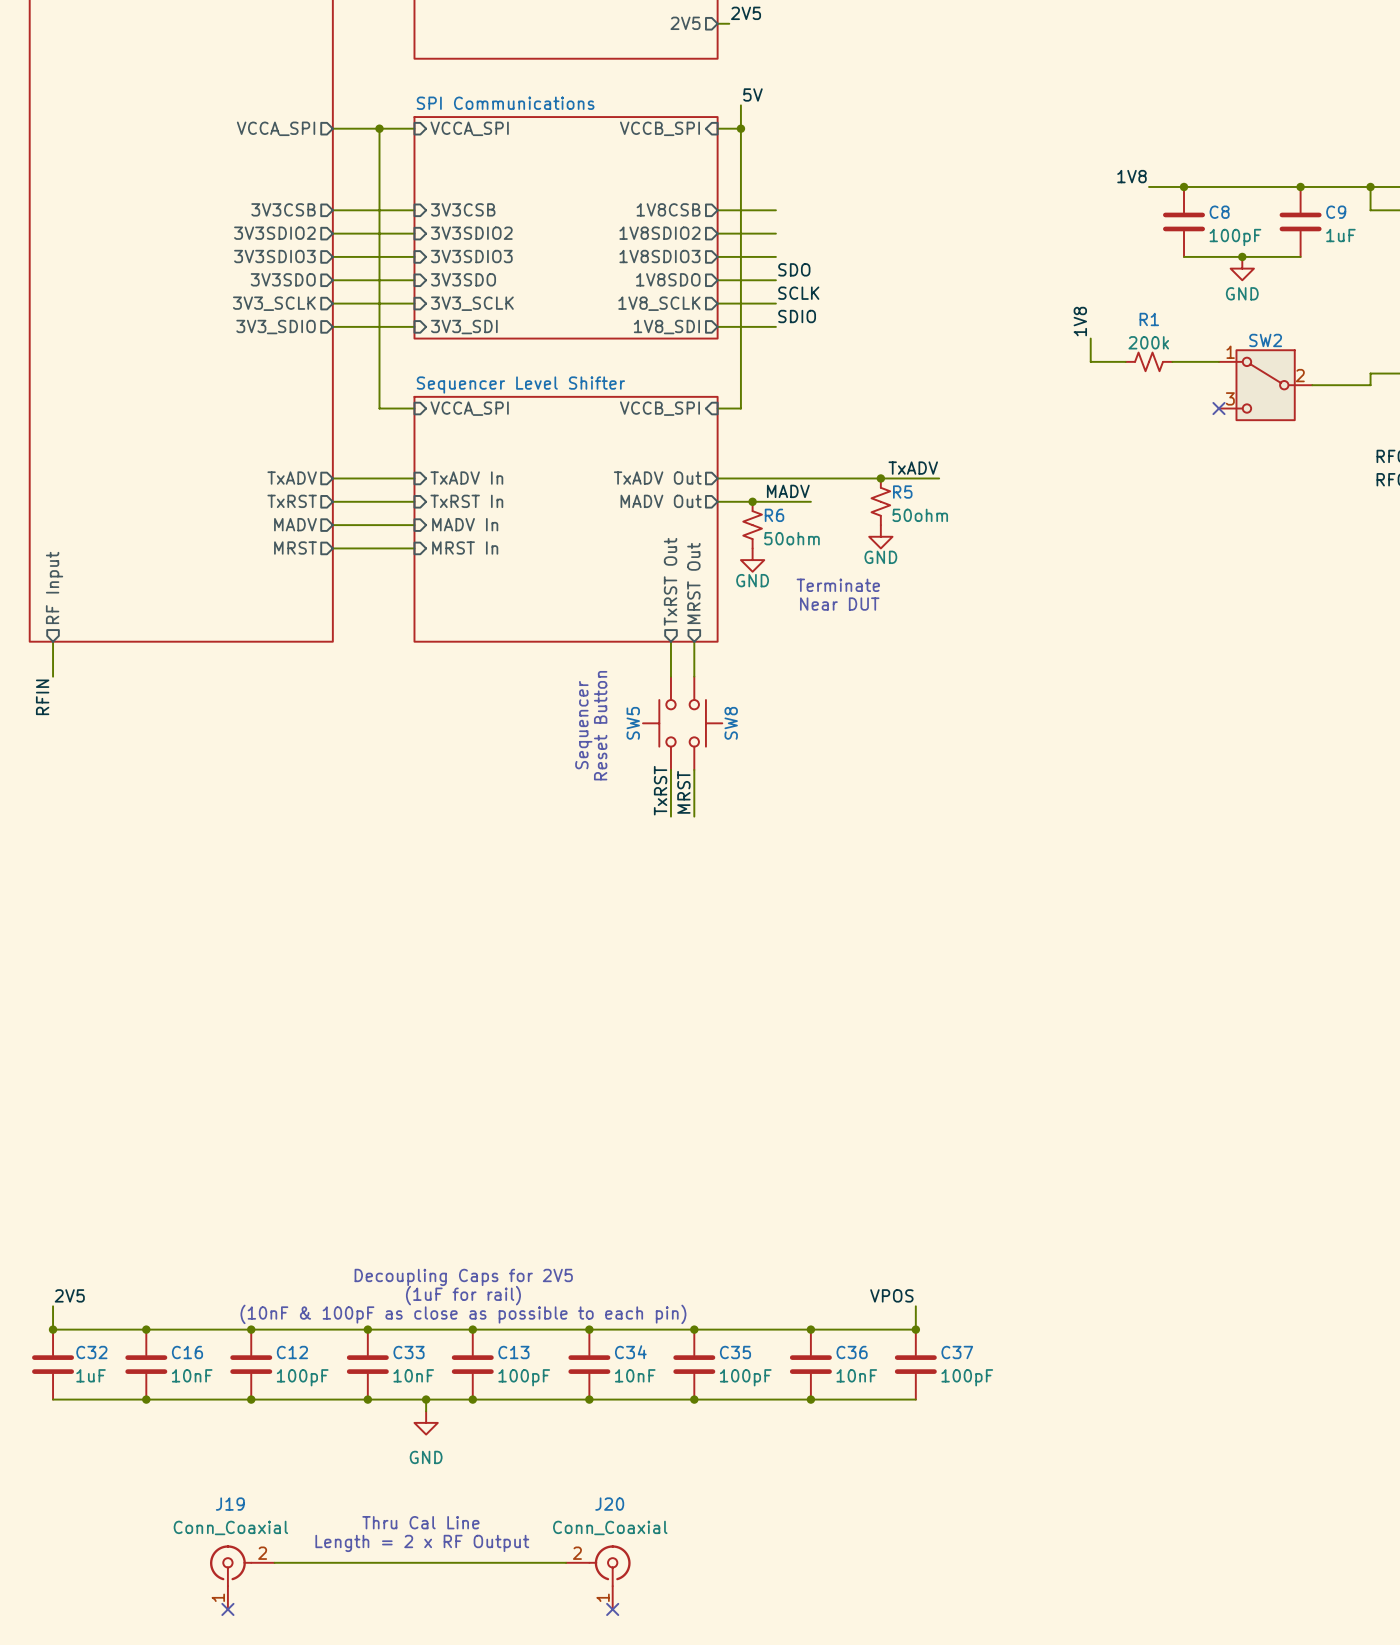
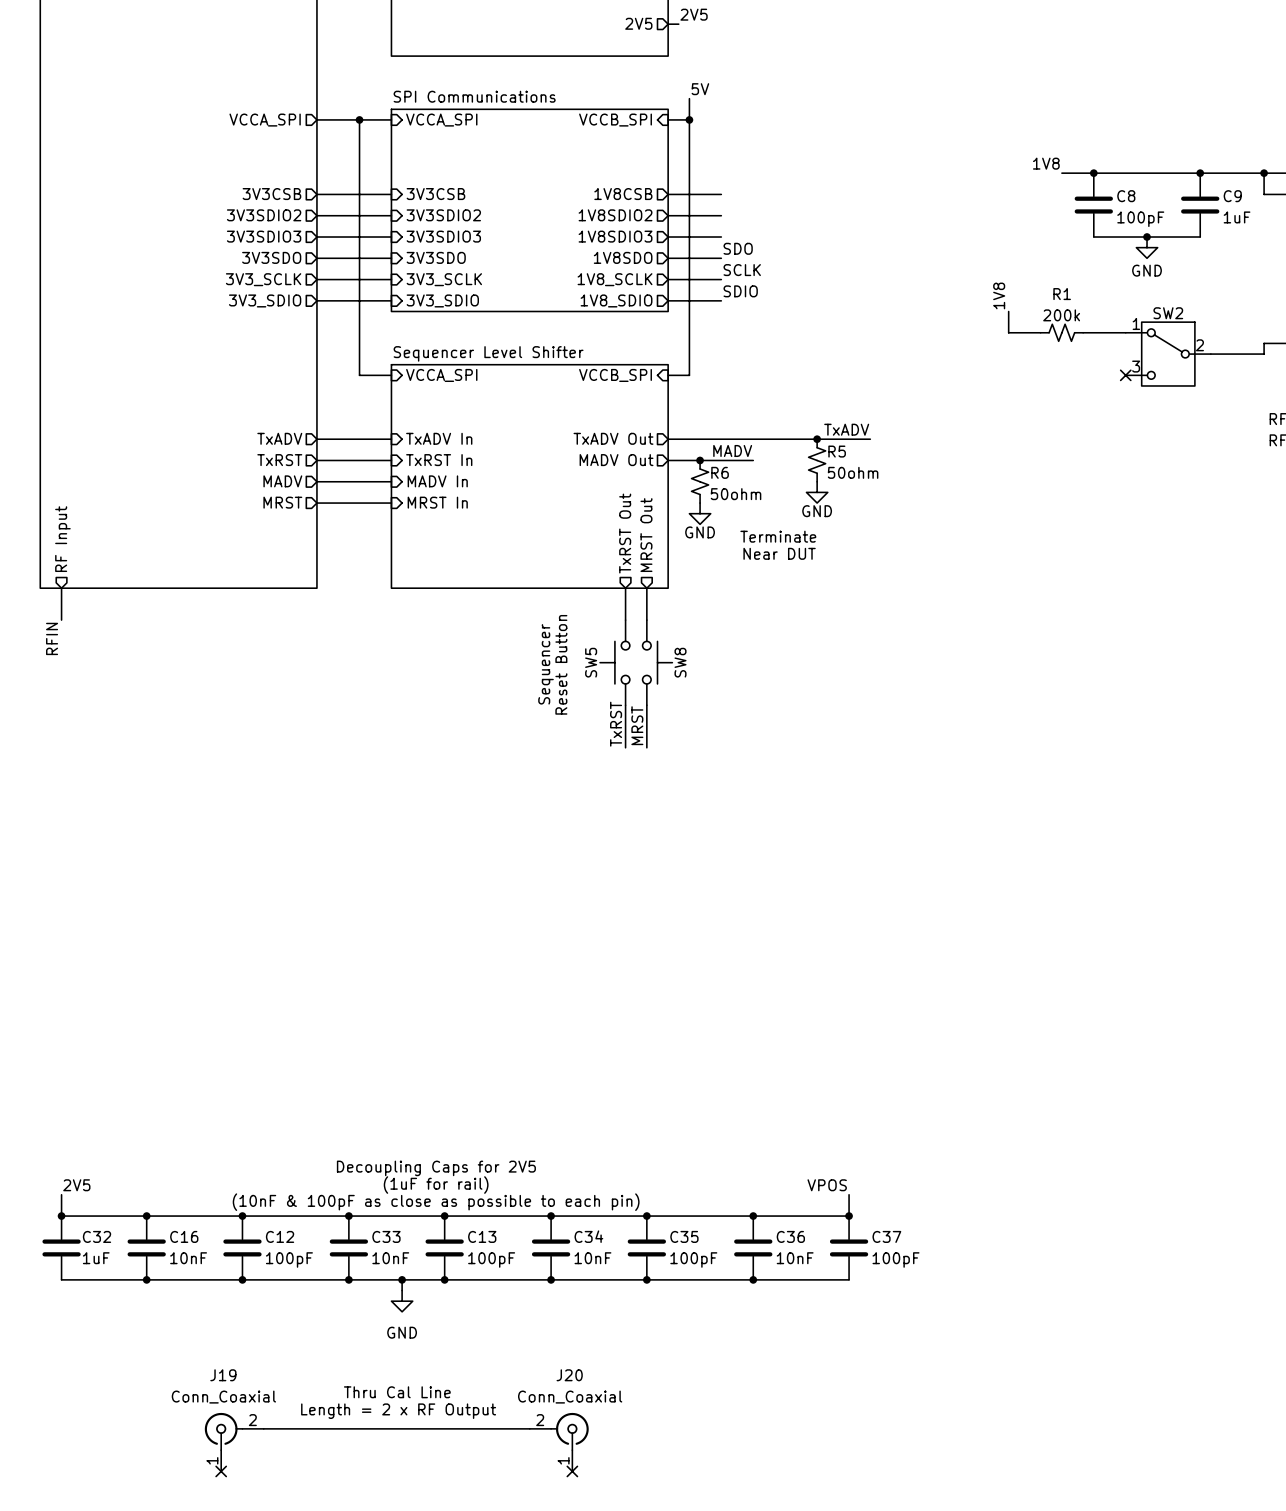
sheet pin: 3V3_SDI (464, 327) -> 3V3_SDIO (442, 300)
sheet pin: 1V8_SDI (666, 327) -> 1V8_SDIO (616, 300)

